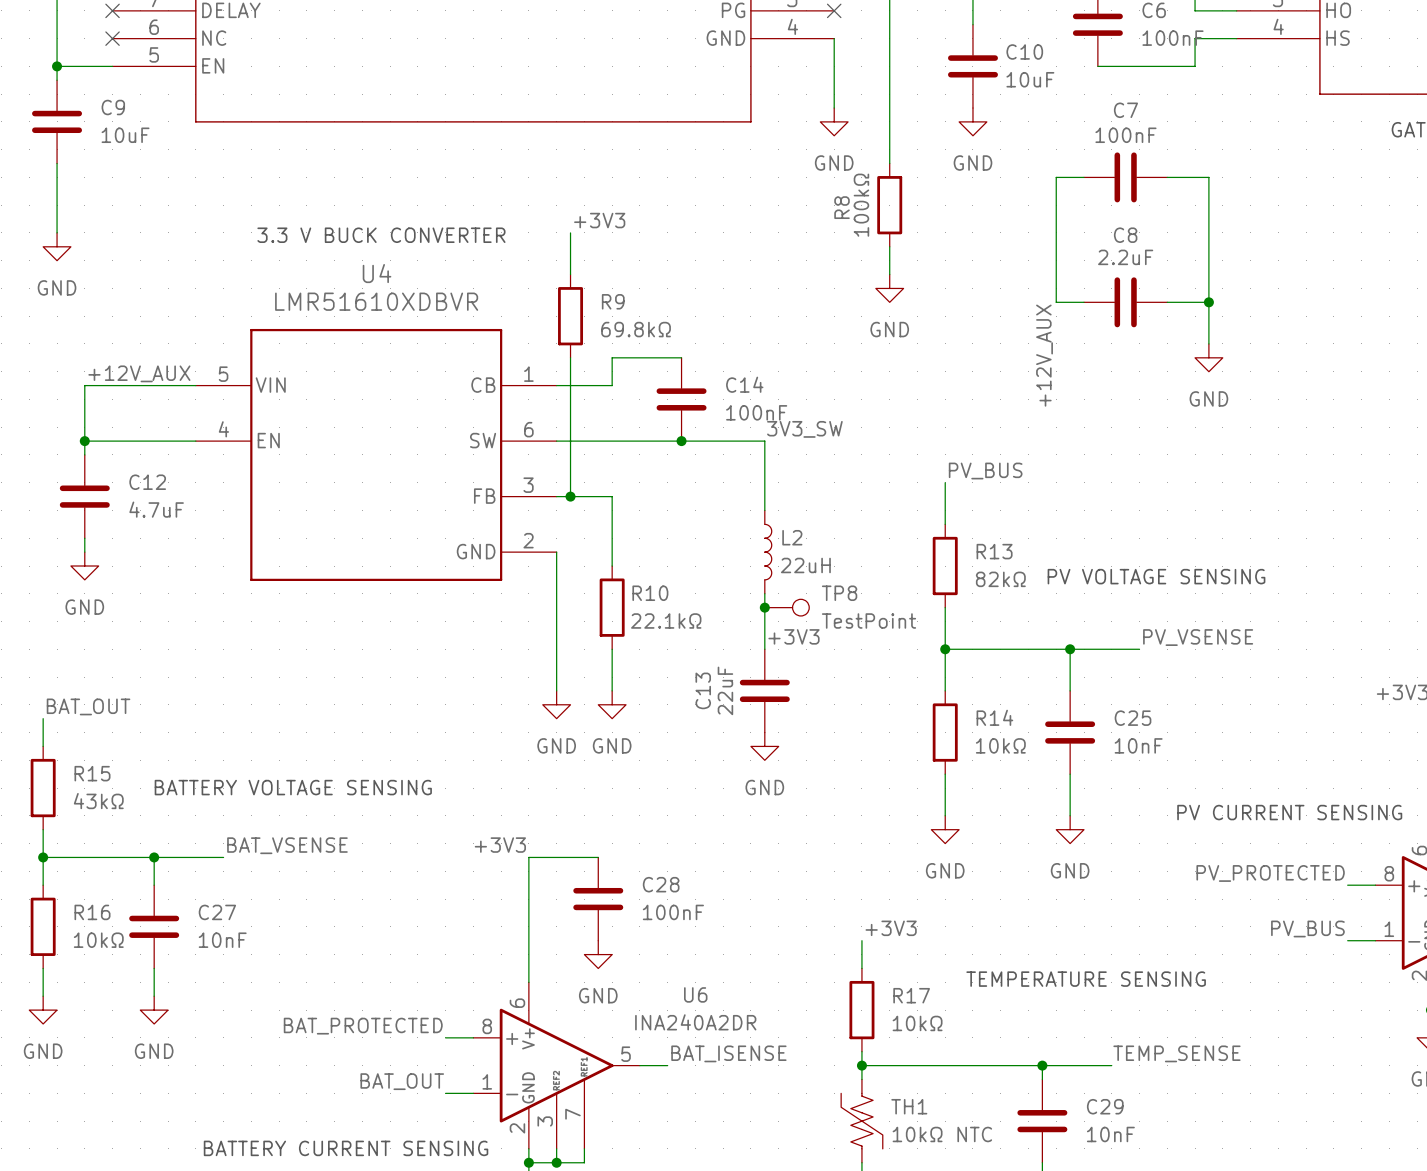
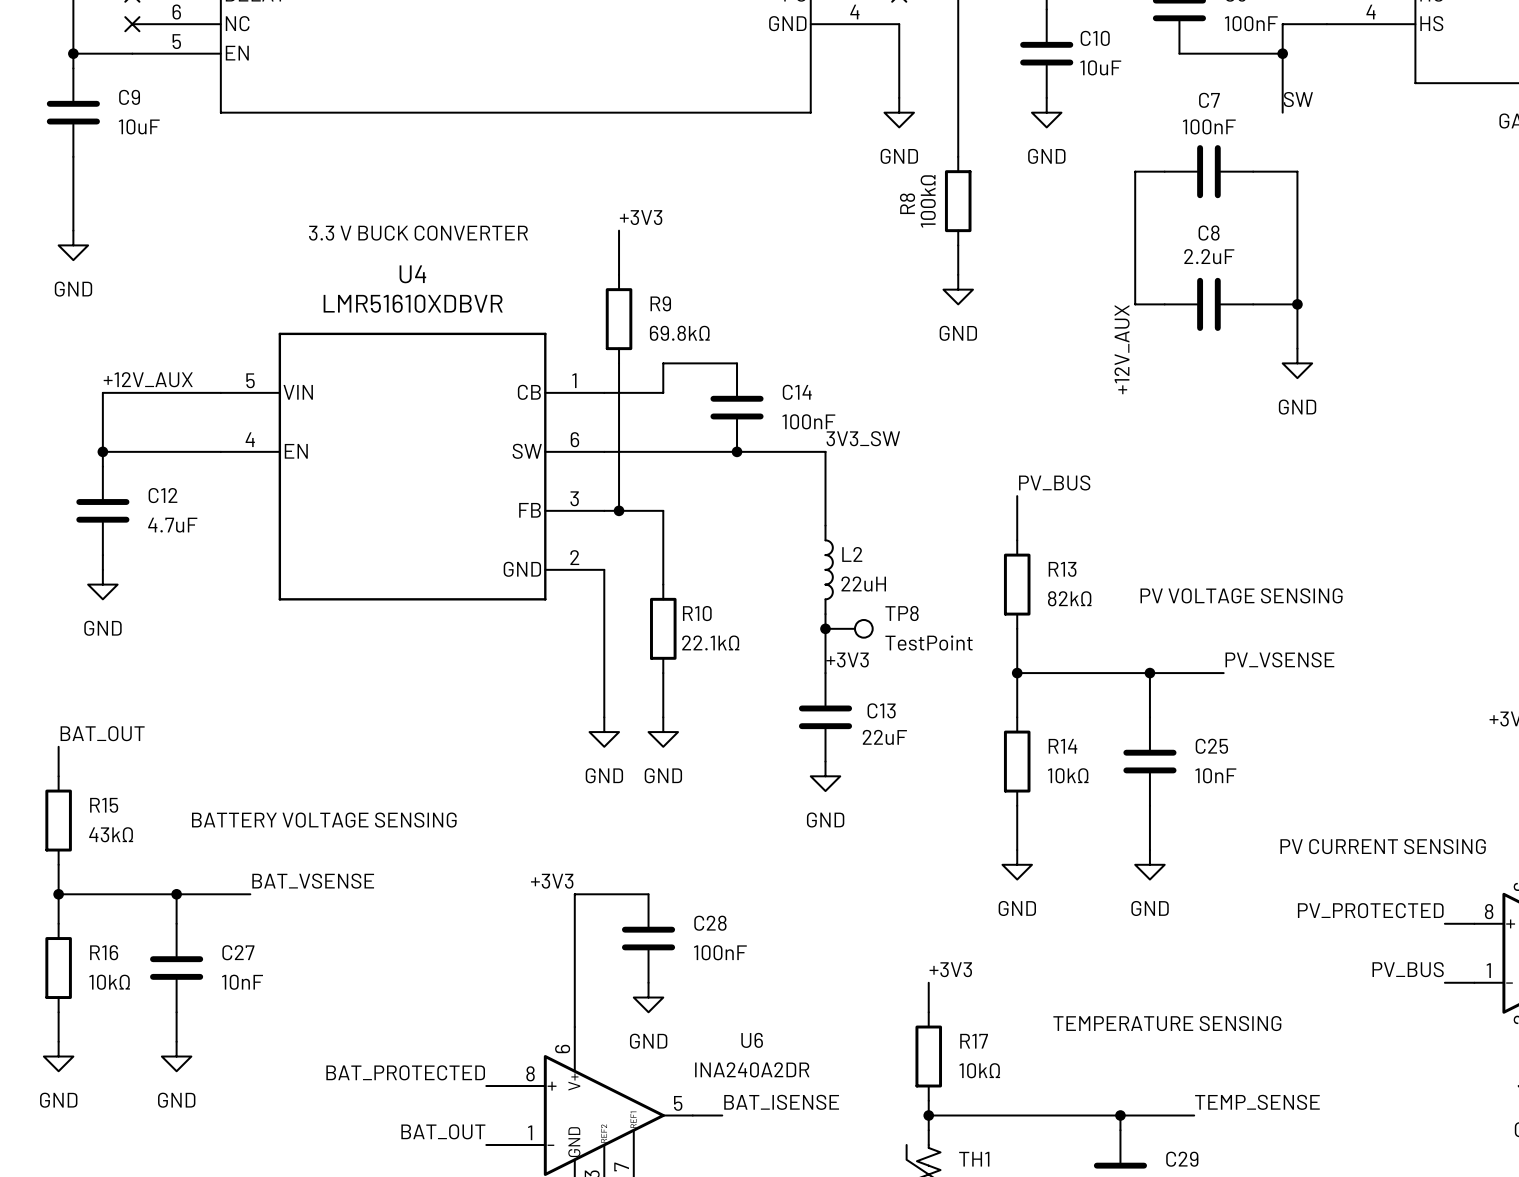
wire: none -> (1282, 53) (1282, 112)
junction: none -> (1282, 53)
label: none -> SW (1298, 99)
C13 name rotation: 0° (703, 690) -> 90° clockwise (881, 710)
C13 name position: C13 (703, 690) -> C13 (881, 710)
C13 value rotation: 0° (725, 690) -> 90° clockwise (884, 737)
C13 value position: 22uF (725, 690) -> 22uF (884, 737)

